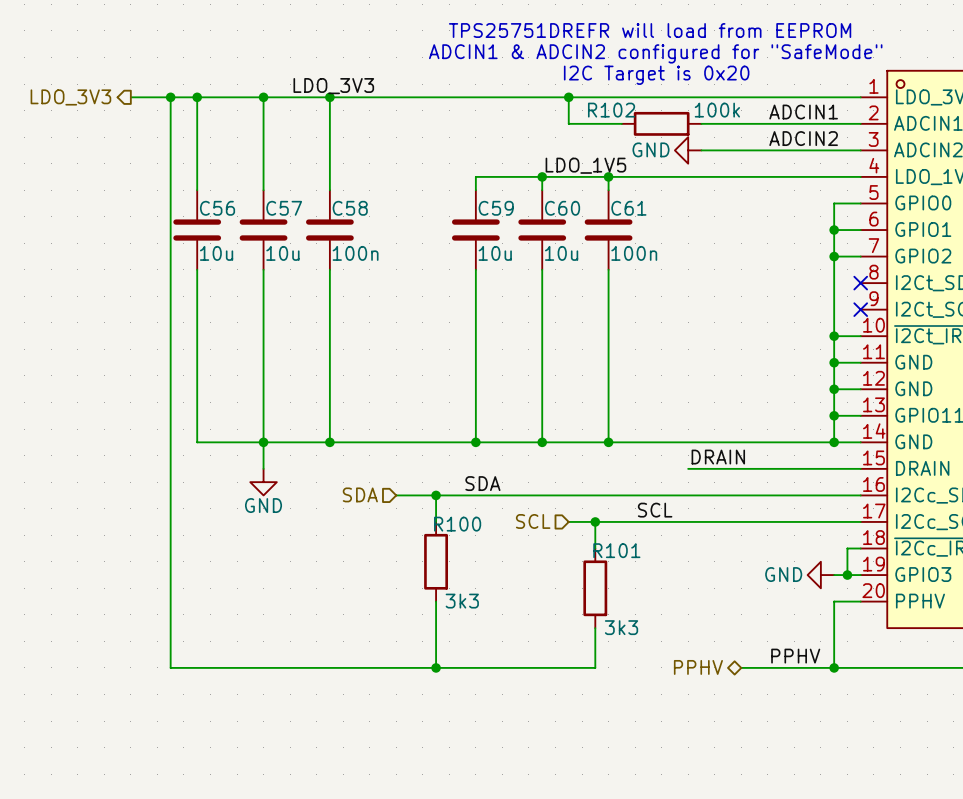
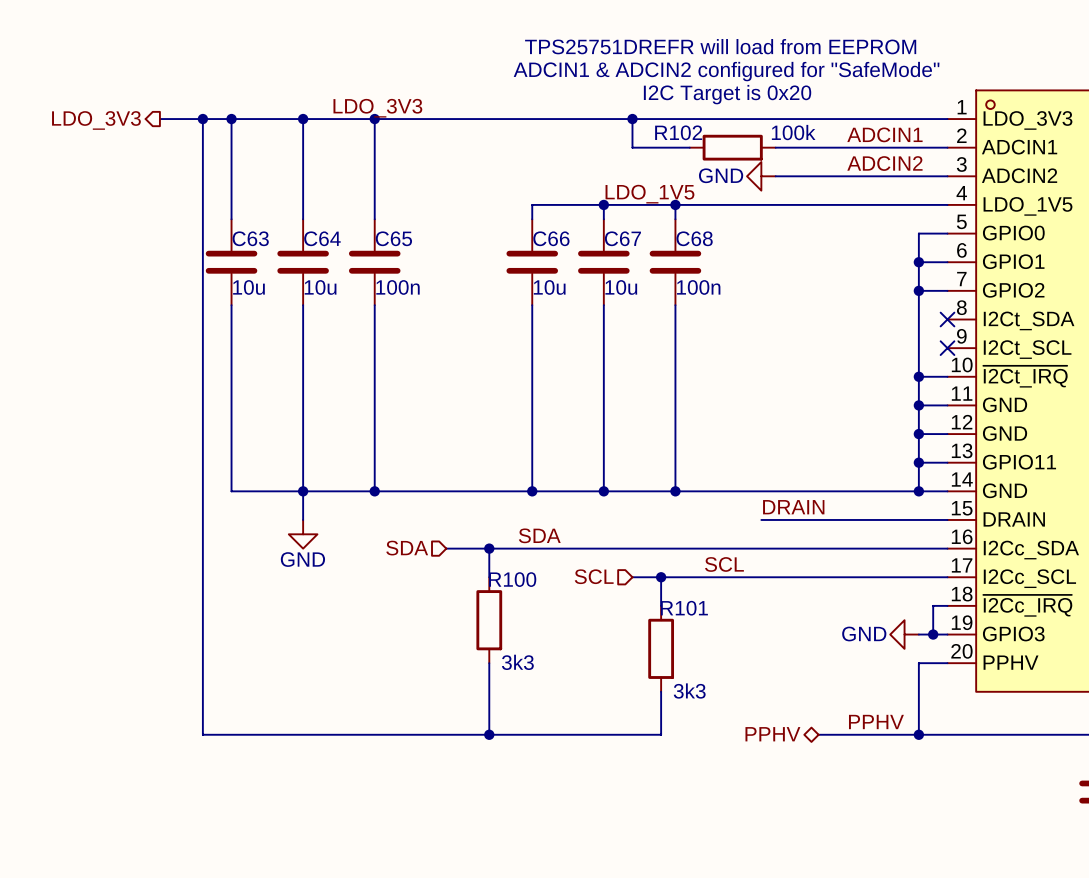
C56 name: C56 (217, 208) -> C63 (250, 238)
C57 name: C57 (284, 208) -> C64 (322, 238)
C58 name: C58 (350, 208) -> C65 (393, 238)
C59 name: C59 (496, 208) -> C66 (551, 238)
C60 name: C60 (562, 208) -> C67 (622, 238)
C61 name: C61 (628, 208) -> C68 (694, 238)

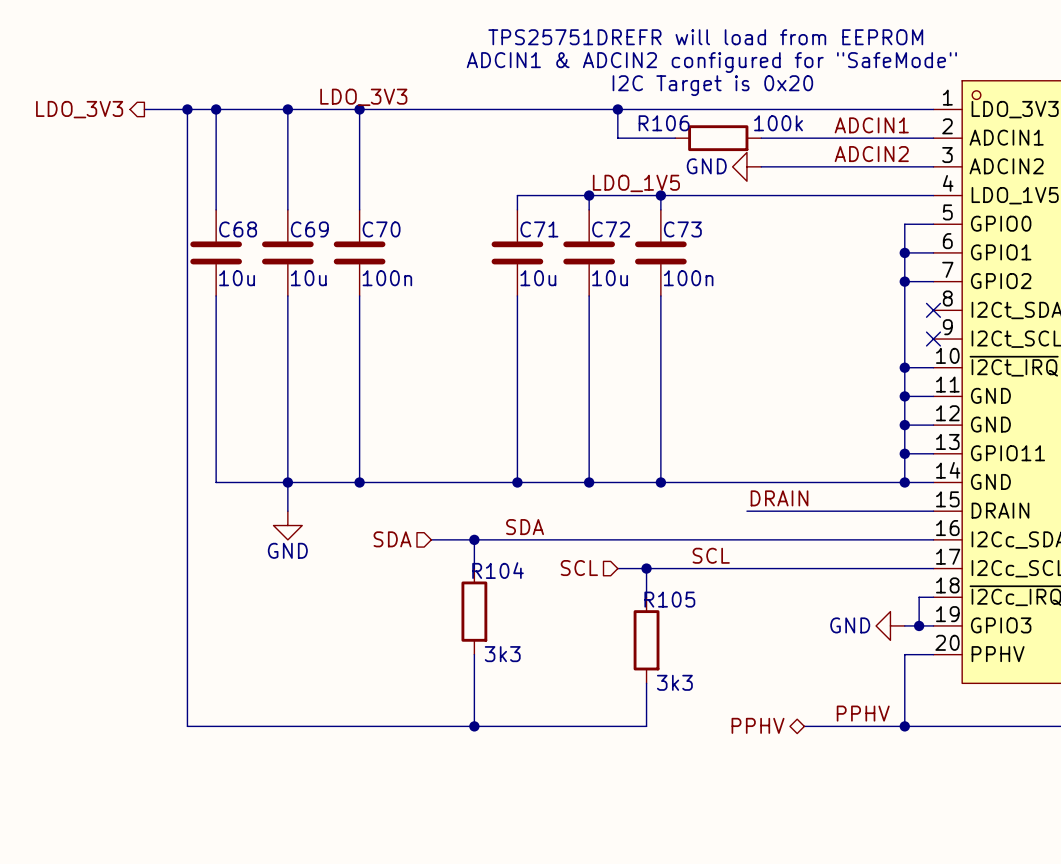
R102 name: R102 (678, 132) -> R106 (664, 123)
C63 name: C63 (250, 238) -> C68 (238, 229)
C64 name: C64 (322, 238) -> C69 (309, 229)
C65 name: C65 (393, 238) -> C70 (381, 229)
C66 name: C66 (551, 238) -> C71 (539, 229)
C67 name: C67 (622, 238) -> C72 (611, 229)
C68 name: C68 (694, 238) -> C73 (682, 229)
R100 name: R100 (512, 579) -> R104 (498, 570)
R101 name: R101 (684, 608) -> R105 (669, 599)

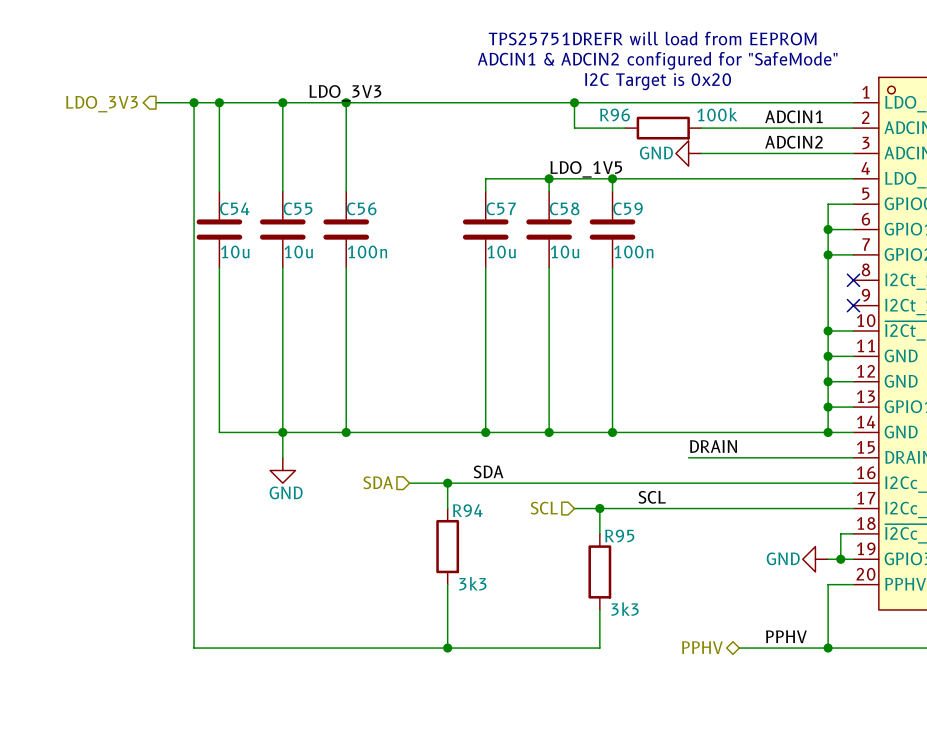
R106 name: R106 (664, 123) -> R96 (614, 115)
C68 name: C68 (238, 229) -> C54 (234, 208)
C69 name: C69 (309, 229) -> C55 (297, 208)
C70 name: C70 (381, 229) -> C56 (361, 208)
C71 name: C71 (539, 229) -> C57 (501, 208)
C72 name: C72 (611, 229) -> C58 (564, 208)
C73 name: C73 (682, 229) -> C59 (628, 208)
R104 name: R104 (498, 570) -> R94 (467, 510)
R105 name: R105 (669, 599) -> R95 (619, 536)

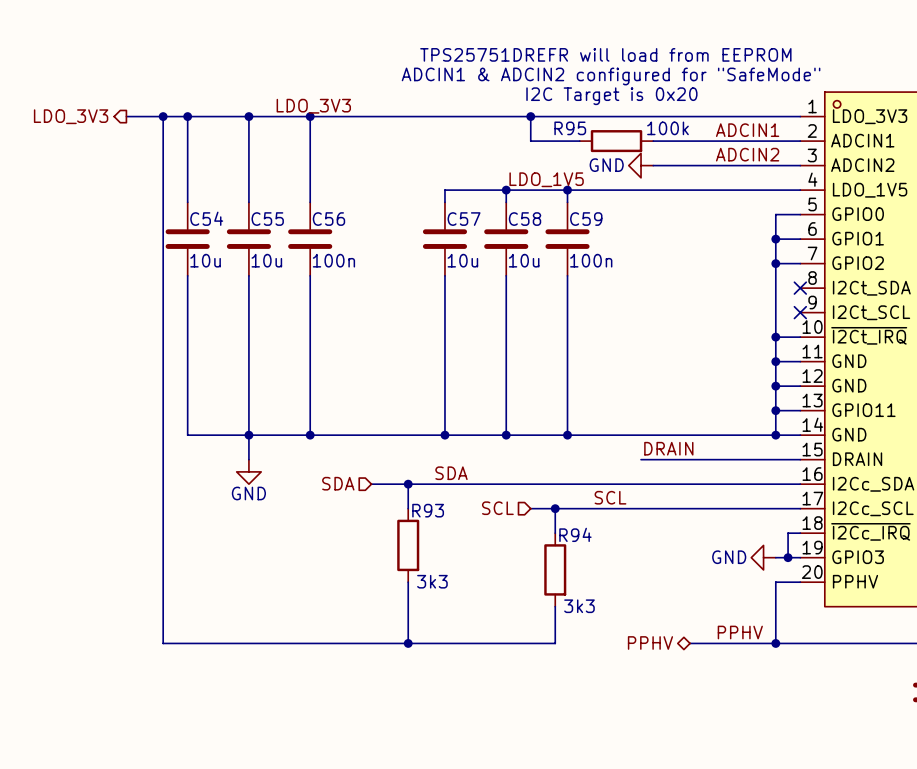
R96 name: R96 (614, 115) -> R95 (570, 128)
R94 name: R94 (467, 510) -> R93 (428, 510)
R95 name: R95 (619, 536) -> R94 (575, 534)

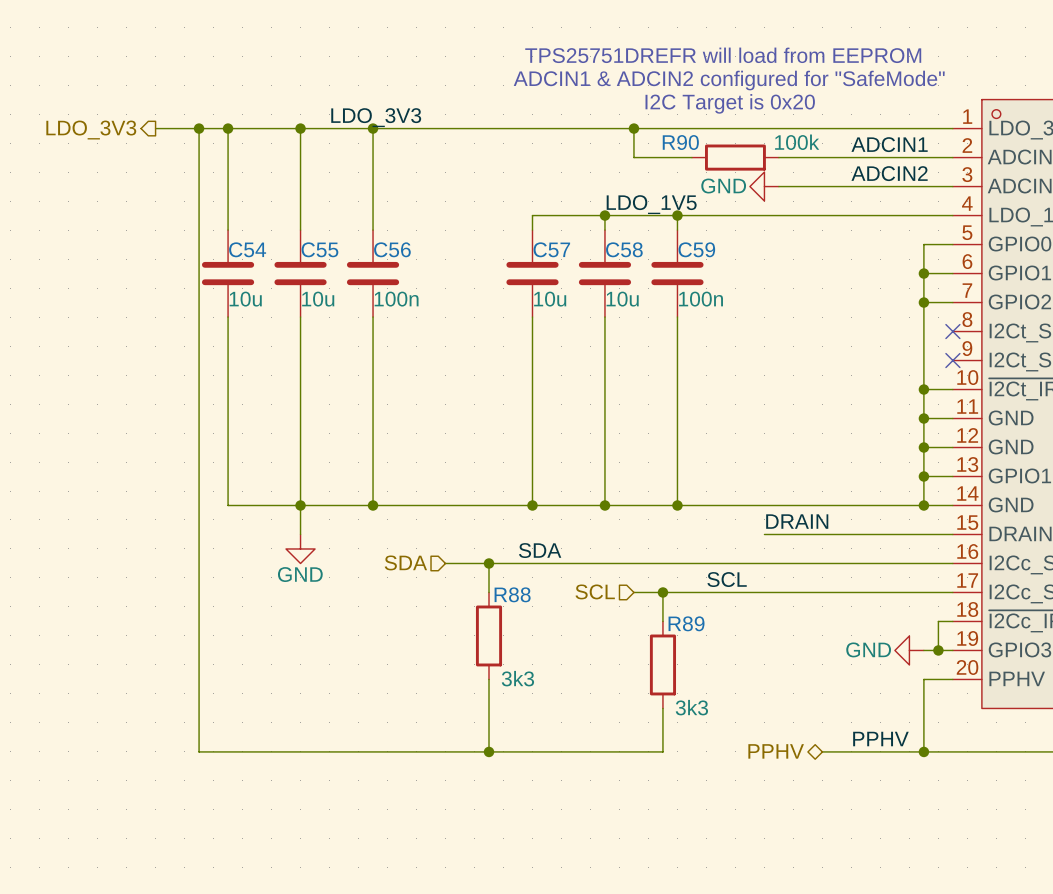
R95 name: R95 (570, 128) -> R90 (680, 142)
R93 name: R93 (428, 510) -> R88 (512, 594)
R94 name: R94 (575, 534) -> R89 (686, 623)

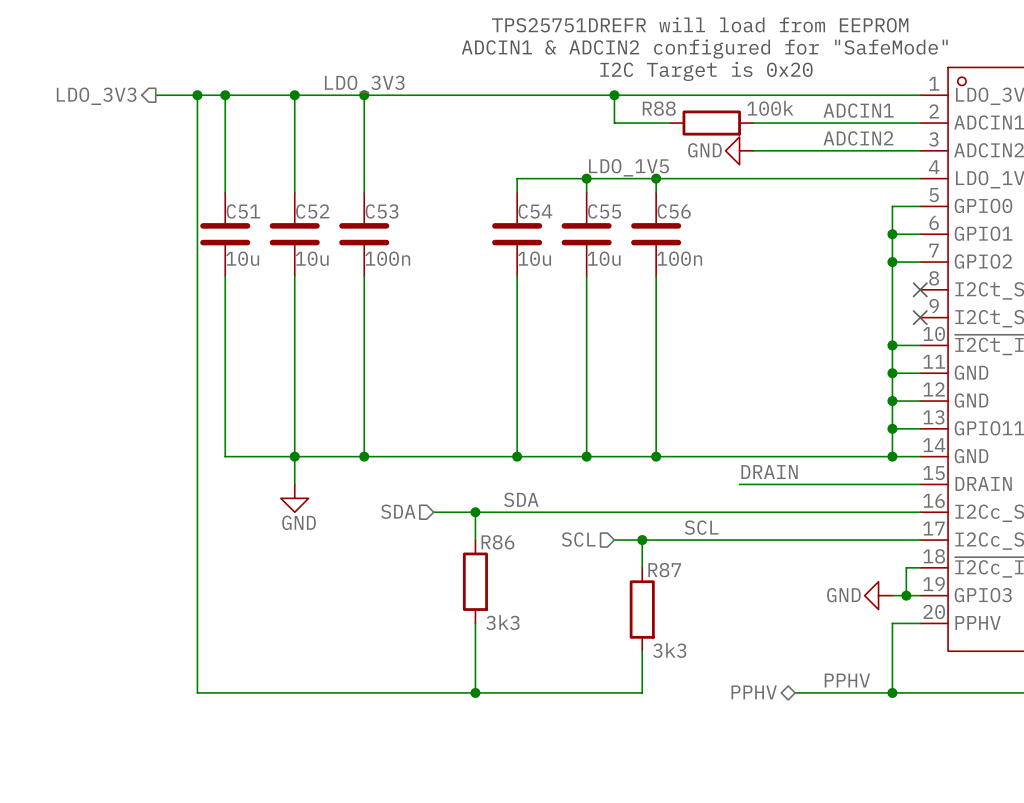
R90 name: R90 (680, 142) -> R88 (659, 108)
C54 name: C54 (247, 249) -> C51 (243, 211)
C55 name: C55 (319, 249) -> C52 (312, 211)
C56 name: C56 (392, 249) -> C53 (382, 211)
C57 name: C57 (551, 249) -> C54 (535, 211)
C58 name: C58 (624, 249) -> C55 (604, 211)
C59 name: C59 (696, 249) -> C56 (674, 211)
R88 name: R88 (512, 594) -> R86 (497, 542)
R89 name: R89 (686, 623) -> R87 (664, 570)

